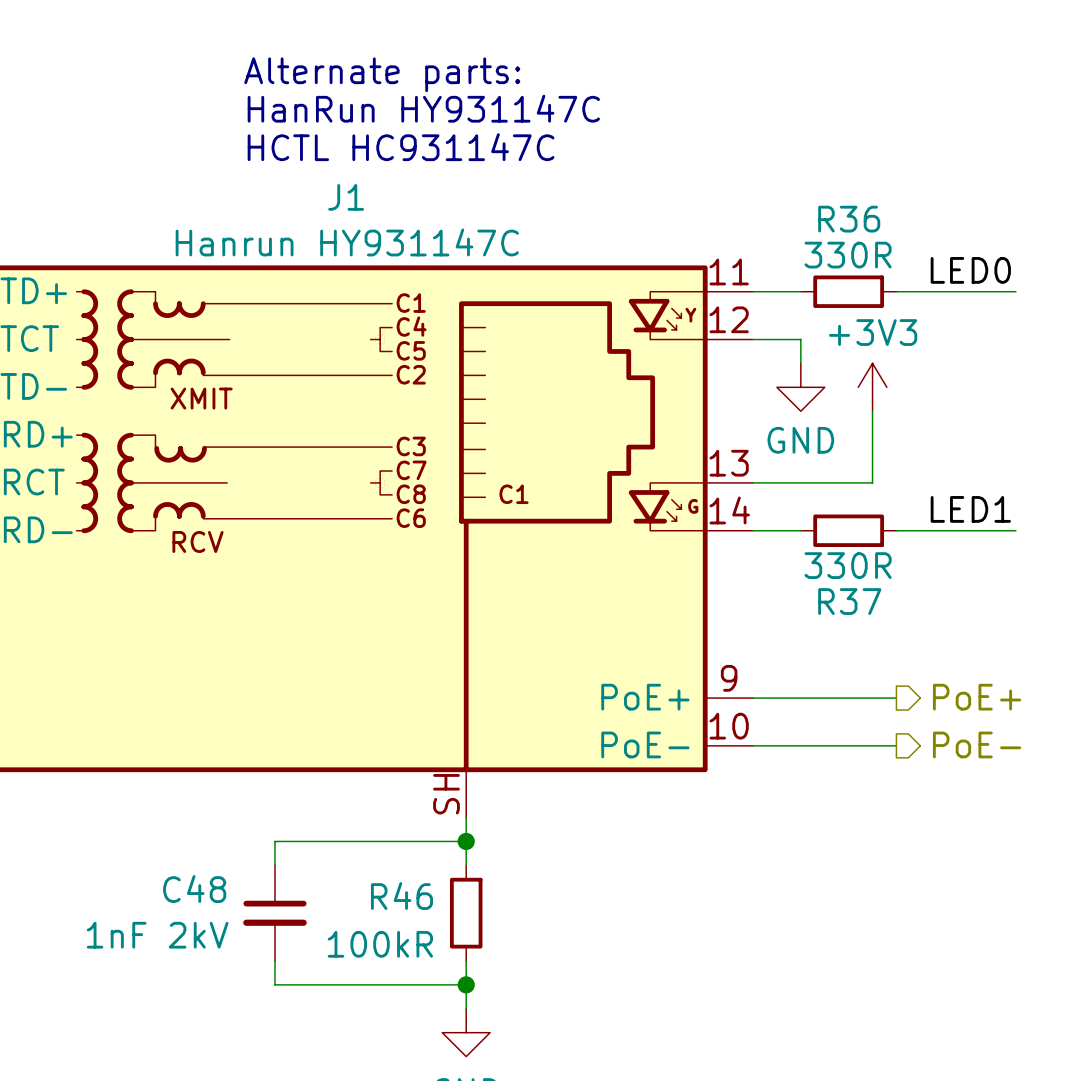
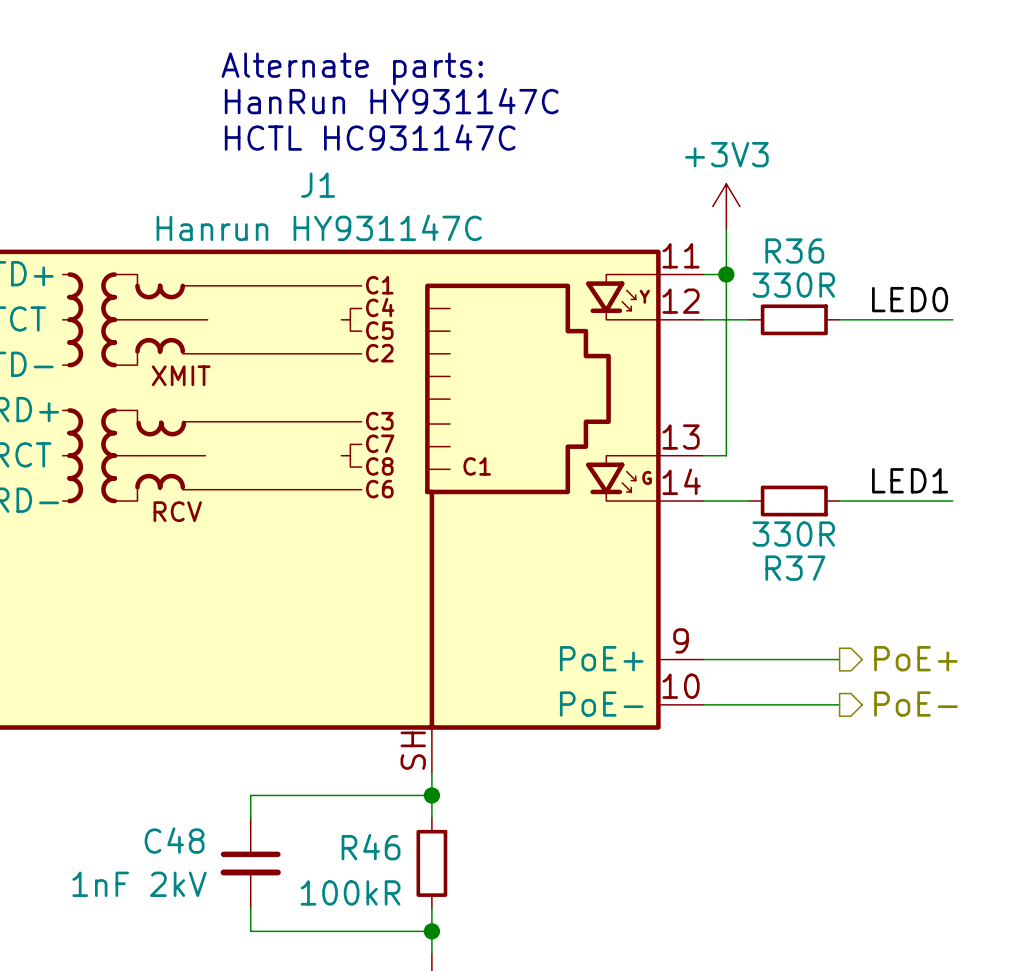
label position: LED0 (970, 270) -> LED0 (910, 299)
wire: (776, 291) (800, 291) -> none
junction: none -> (726, 274)
R36 position: (848, 291) -> (794, 319)
wire: (896, 291) (1015, 291) -> (839, 319) (952, 319)
wire: (800, 339) (800, 363) -> none
power symbol: GND (800, 387) -> none
power symbol position: +3V3 (872, 387) -> +3V3 (726, 206)
wire: (872, 411) (872, 482) (776, 482) -> (726, 229) (726, 455)

